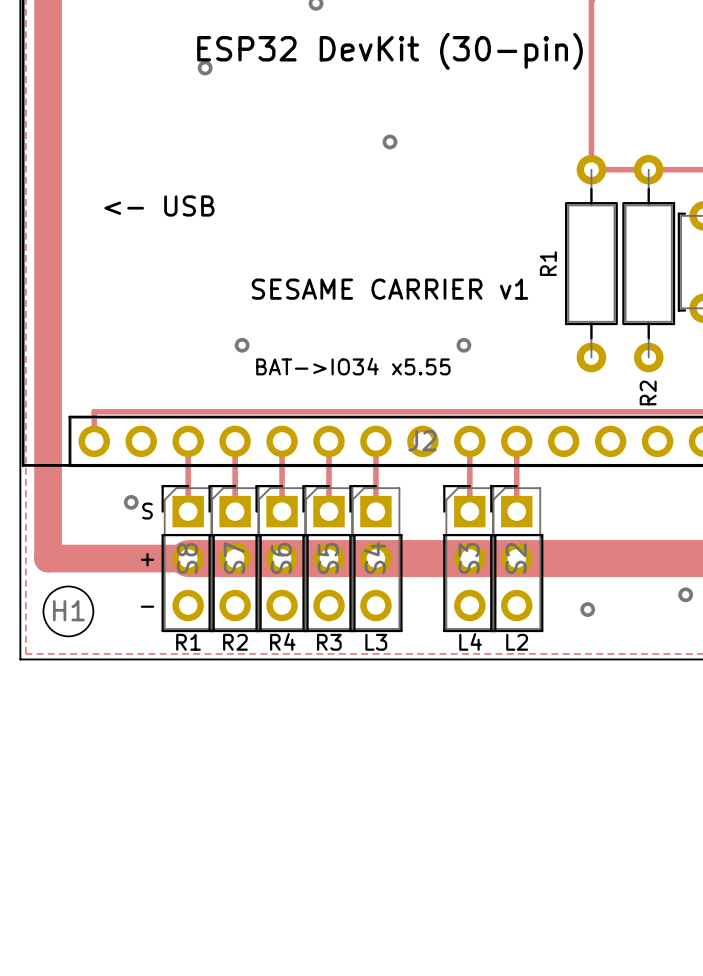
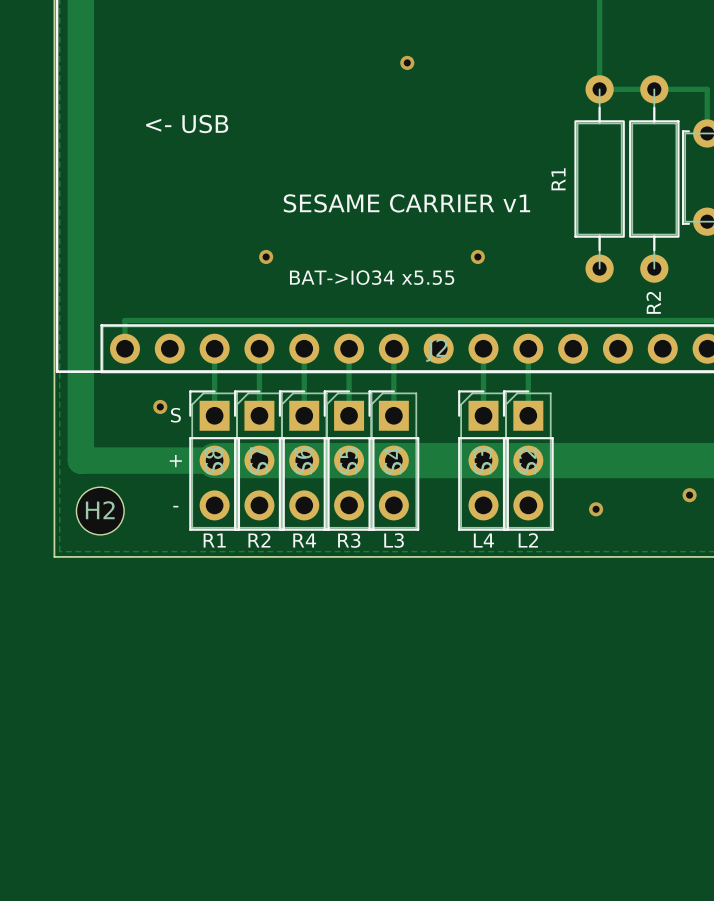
H1 name: H1 (68, 610) -> H2 (100, 510)

